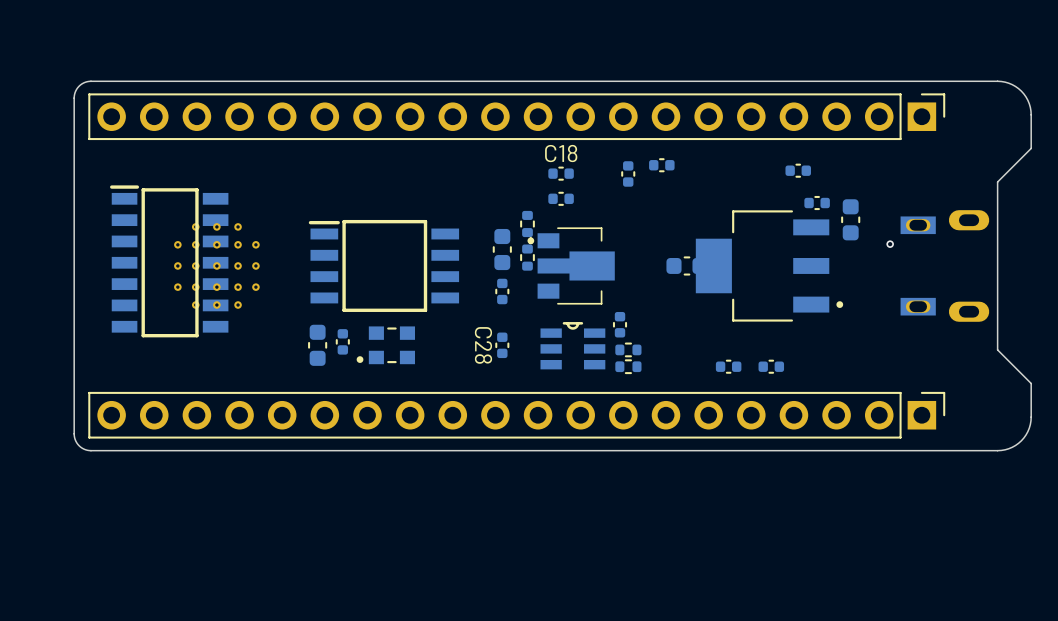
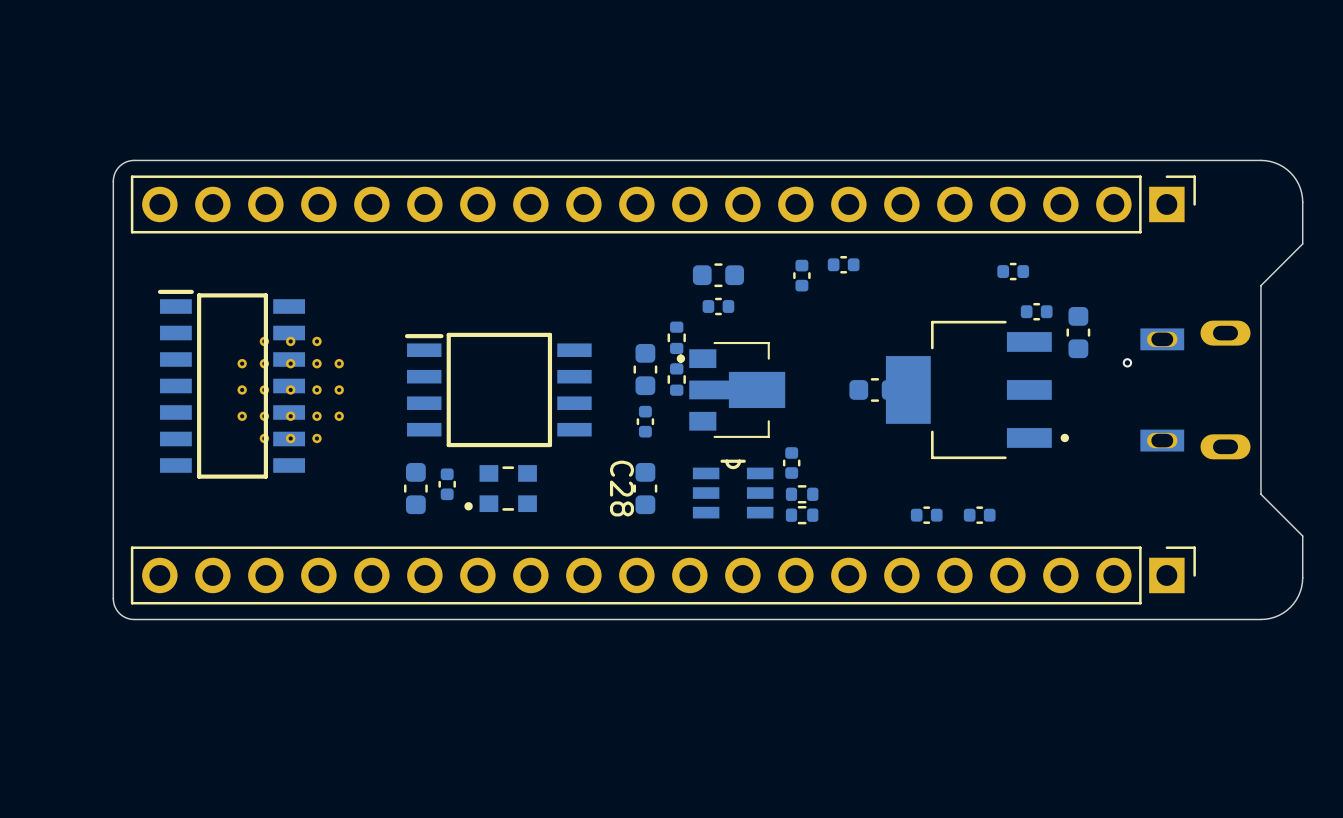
C18: (561, 173) -> none
part: none -> (718, 275)
C28 footprint: [495, 332, 510, 359] -> [633, 463, 658, 515]

